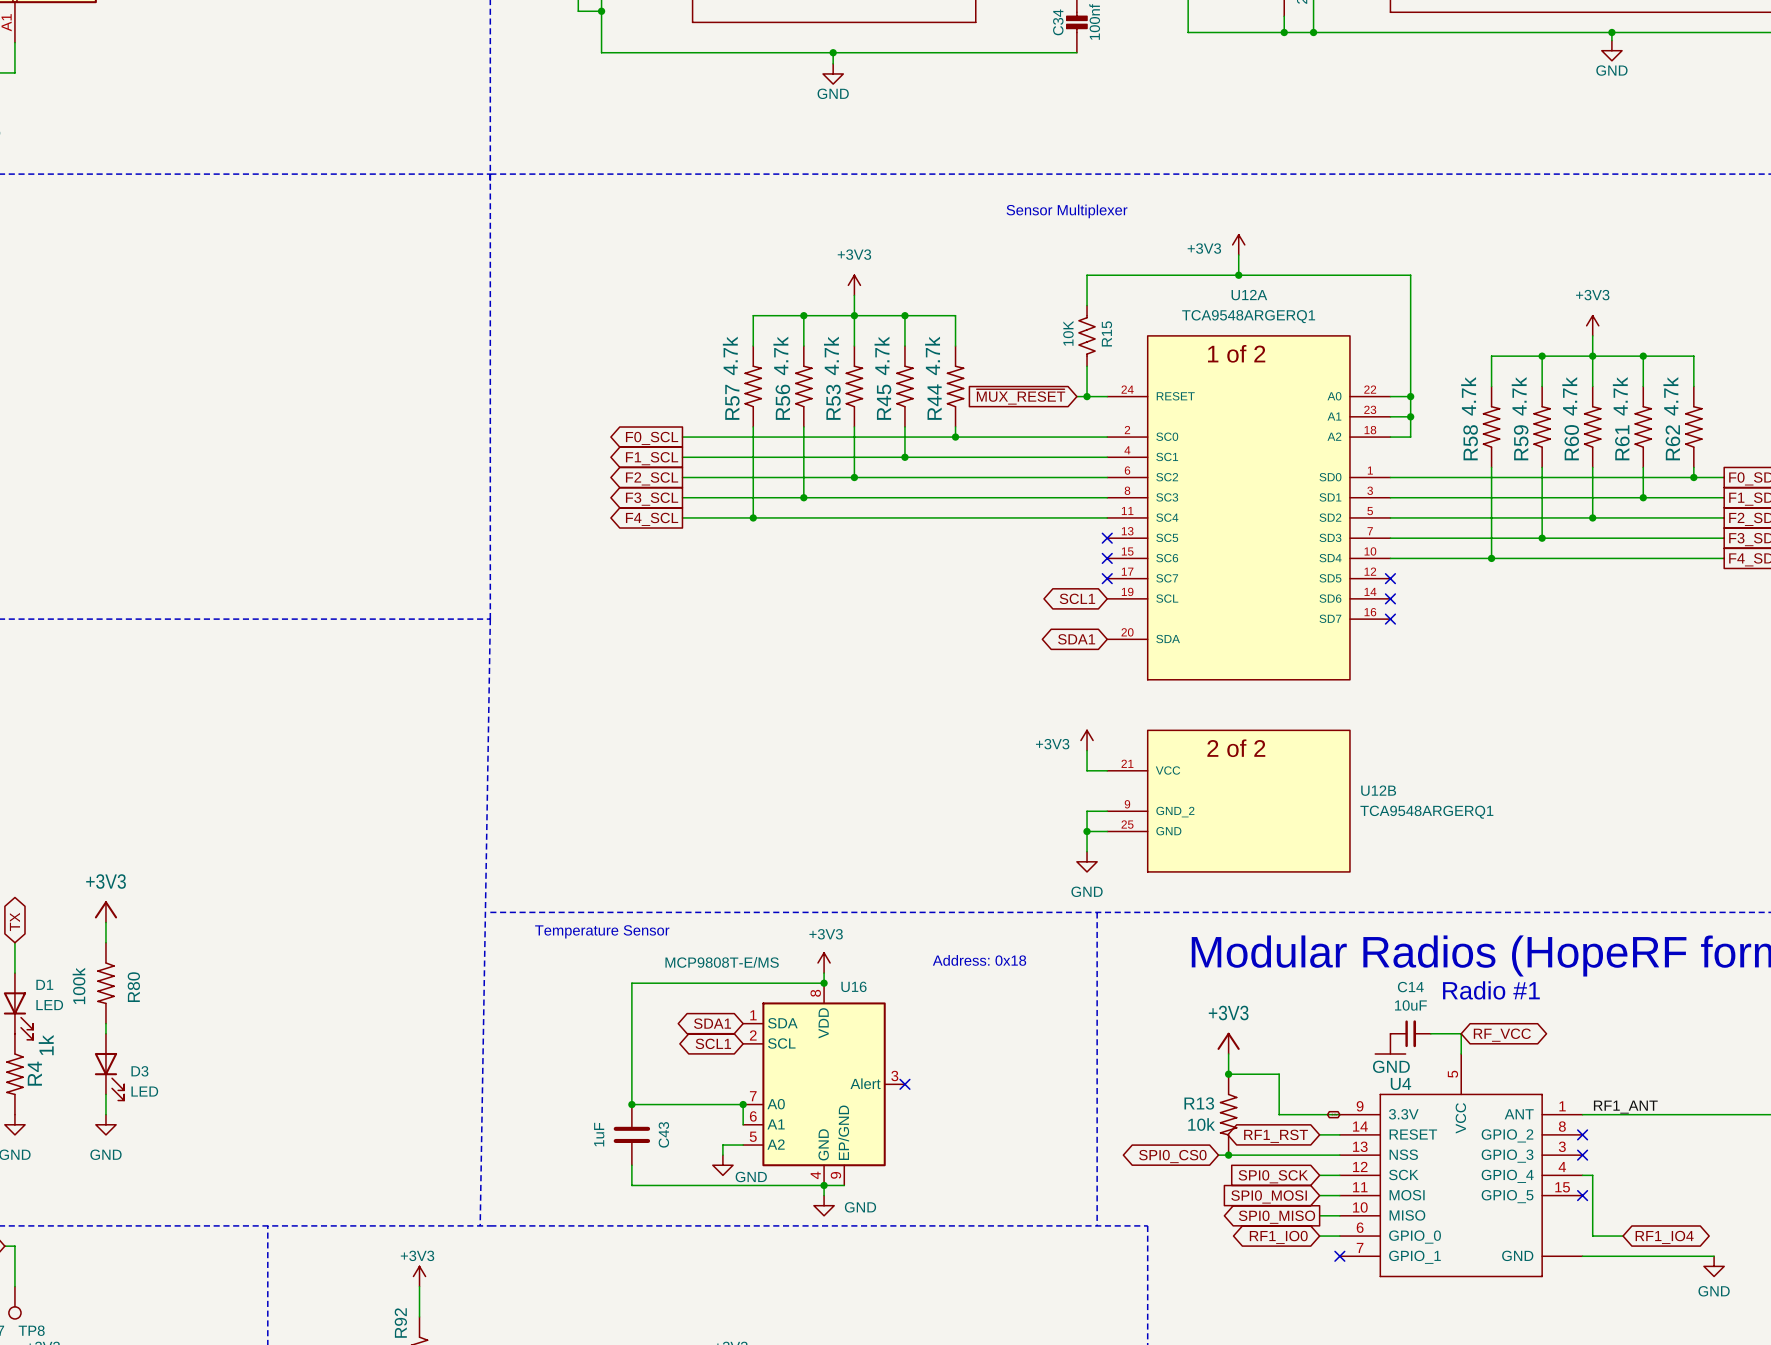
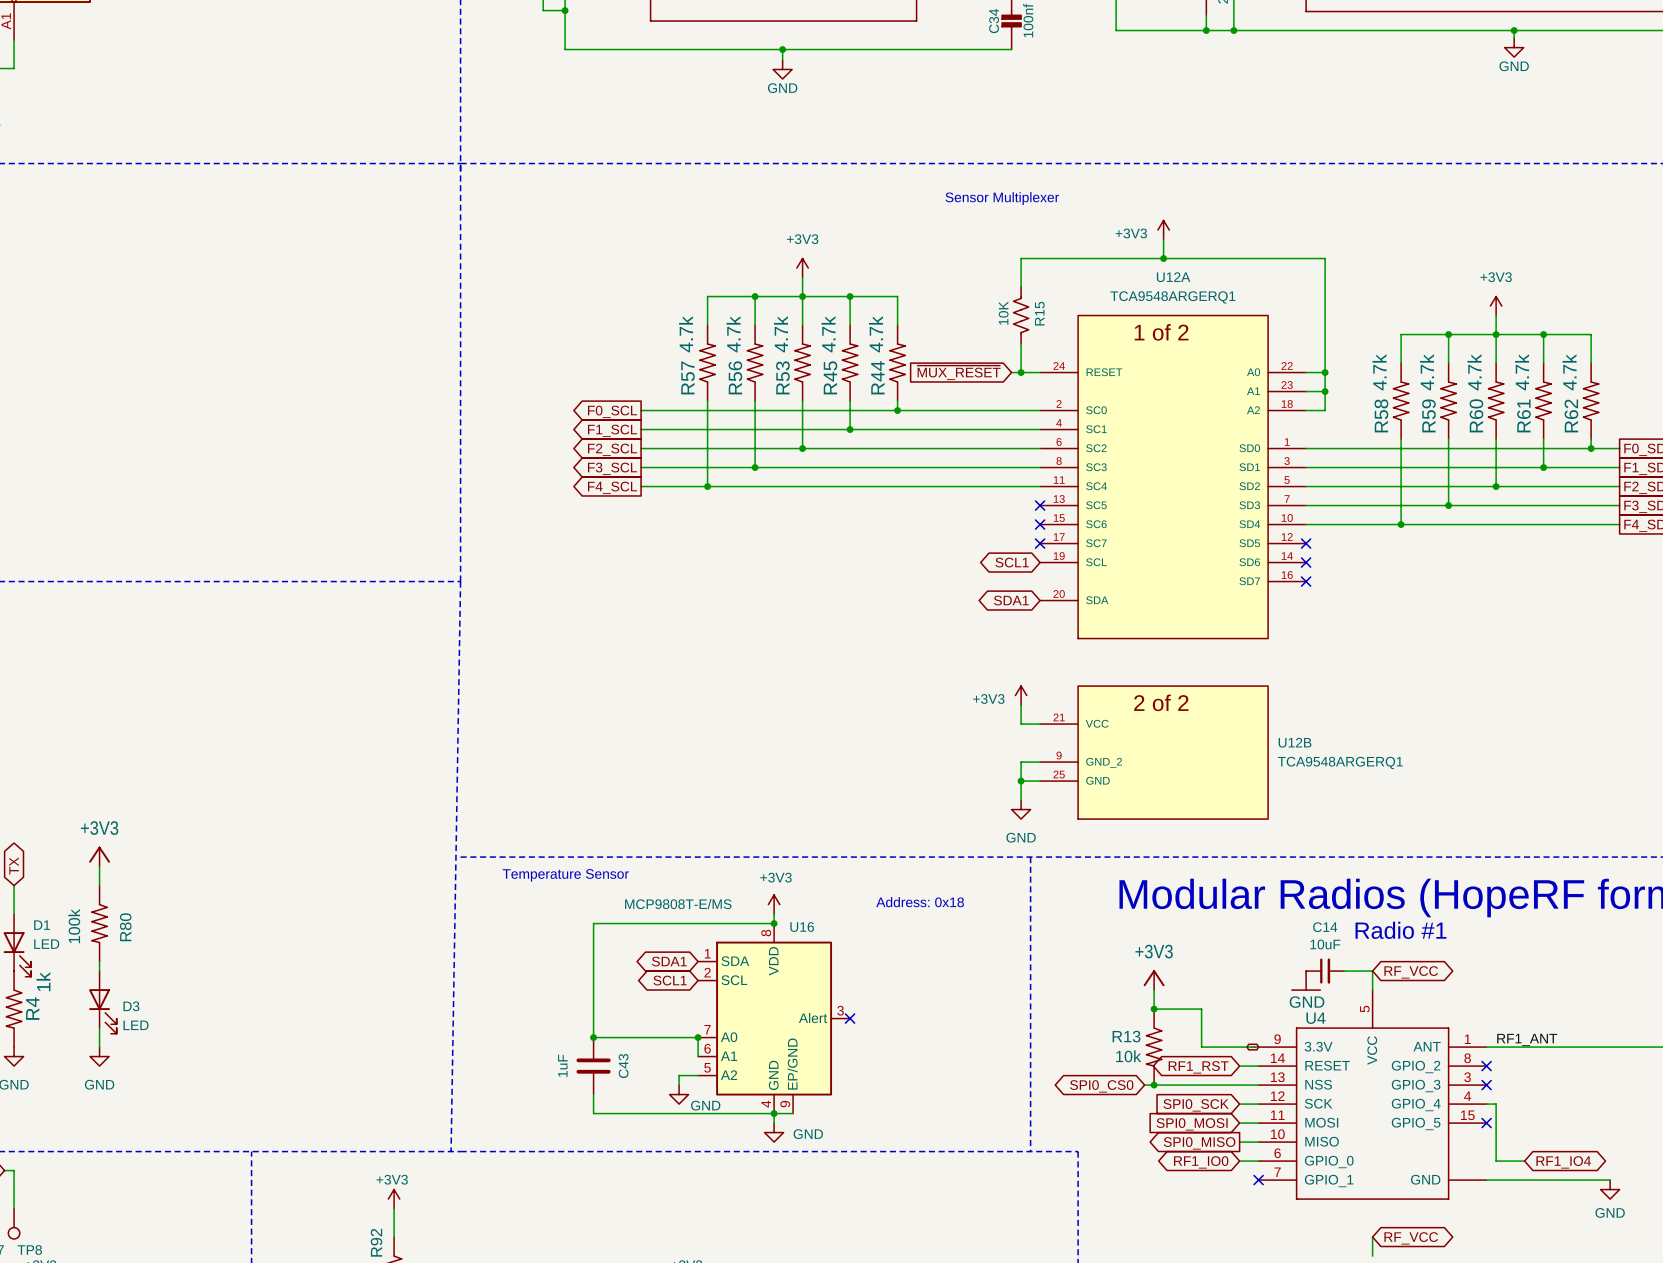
wire: none -> (1372, 1237) (1372, 1256)
global label: none -> RF_VCC (1411, 1238)

